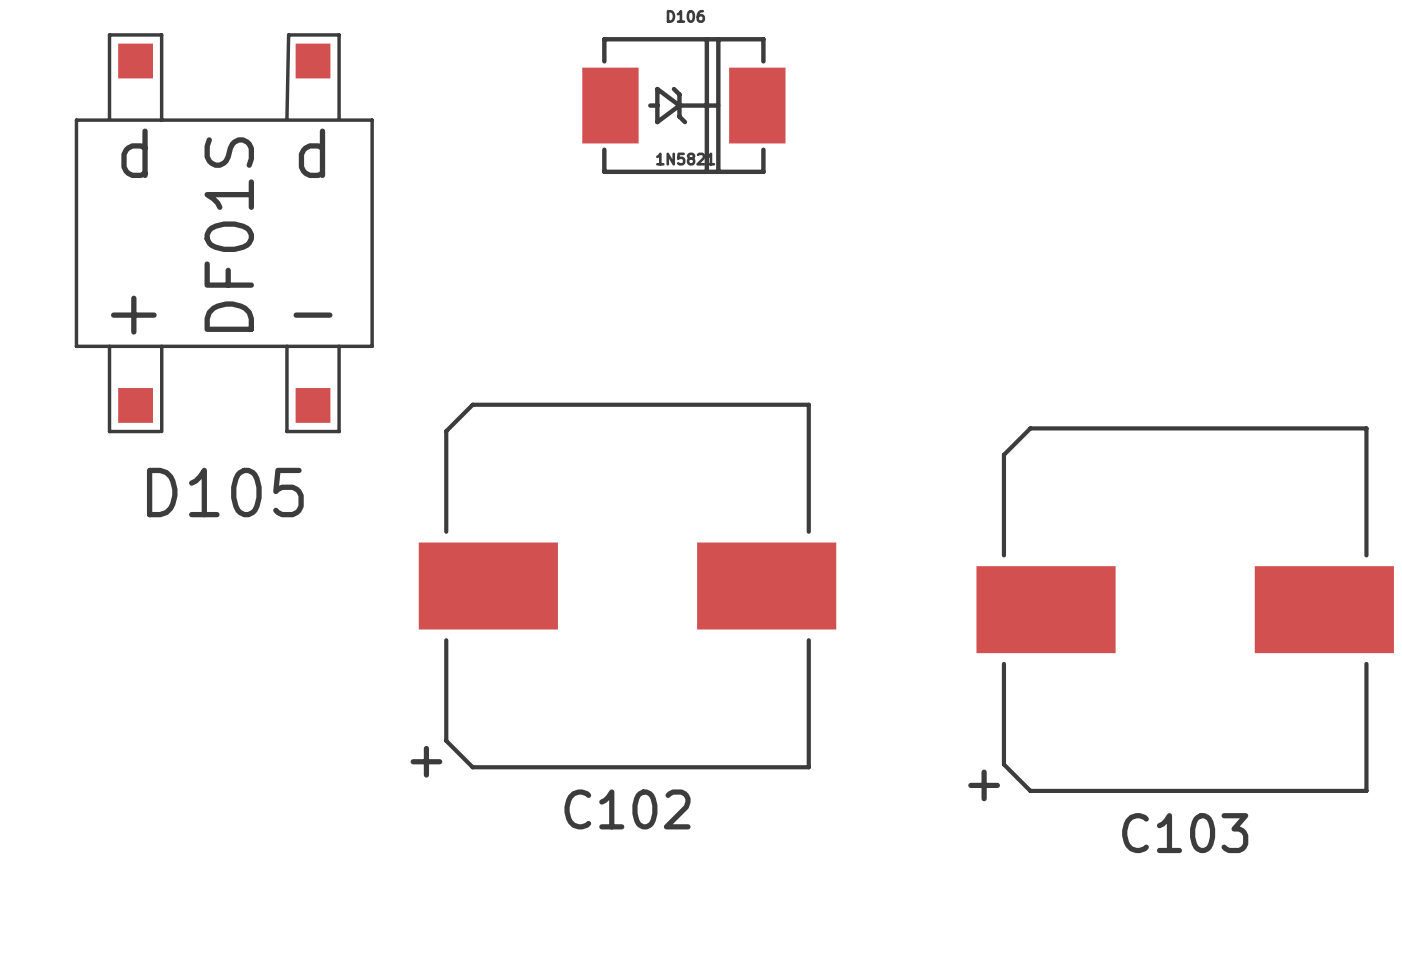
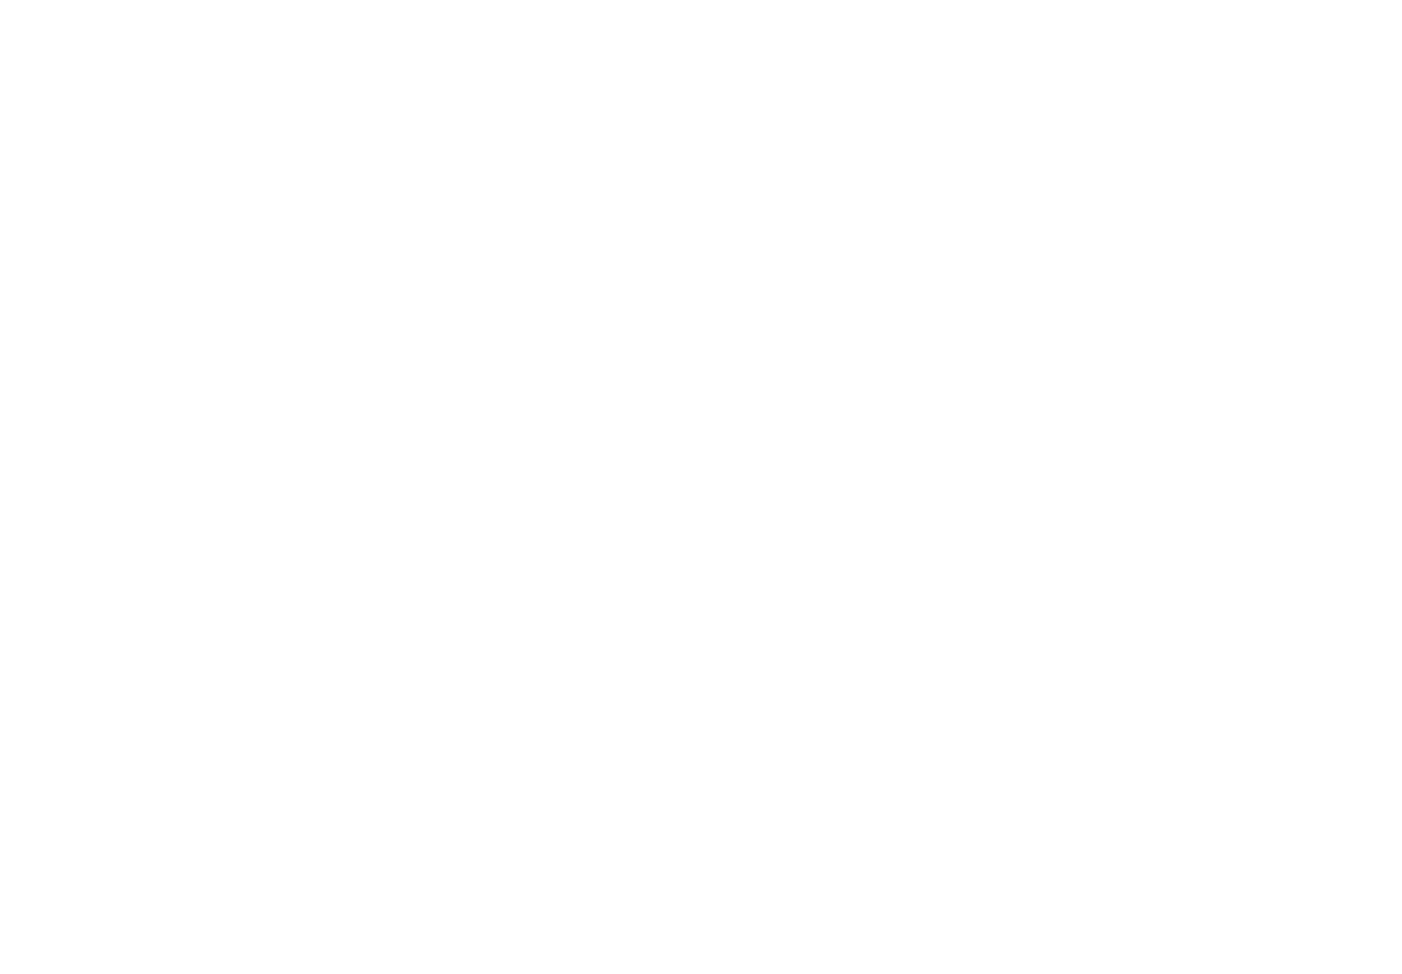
D106: 1N5821 (683, 105) -> none
D105: DF01S (224, 233) -> none
C102: (627, 586) -> none
C103: (1185, 609) -> none

